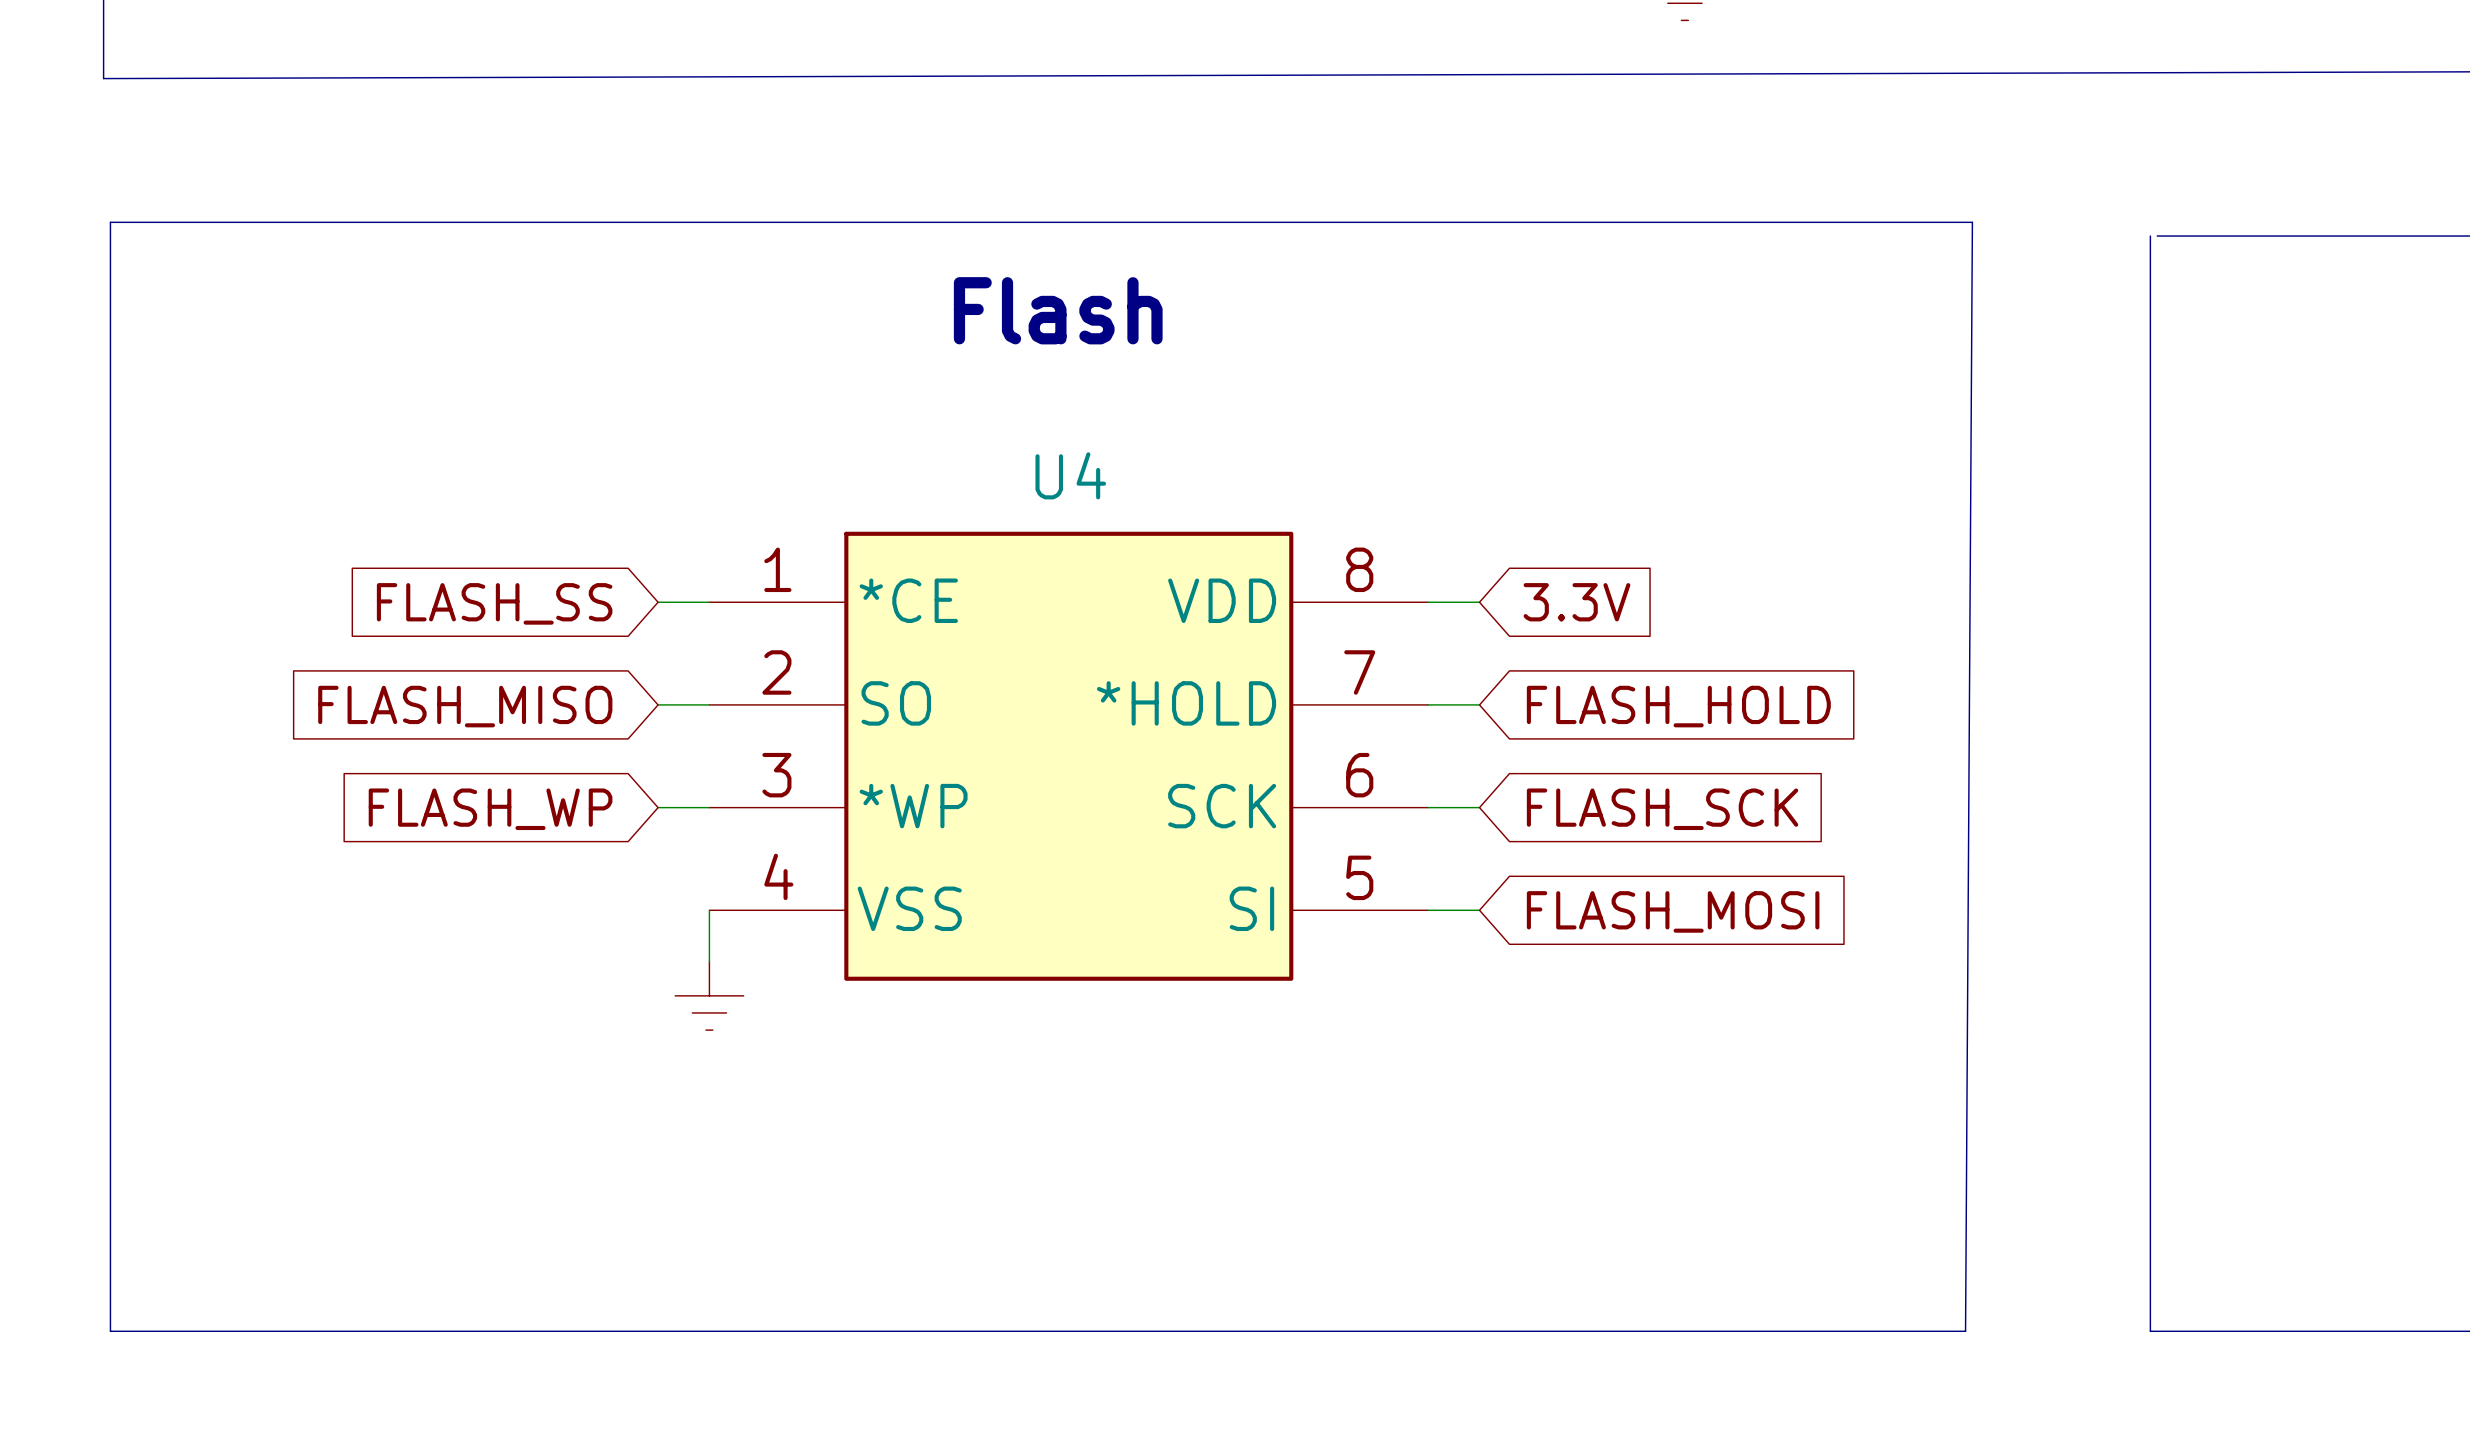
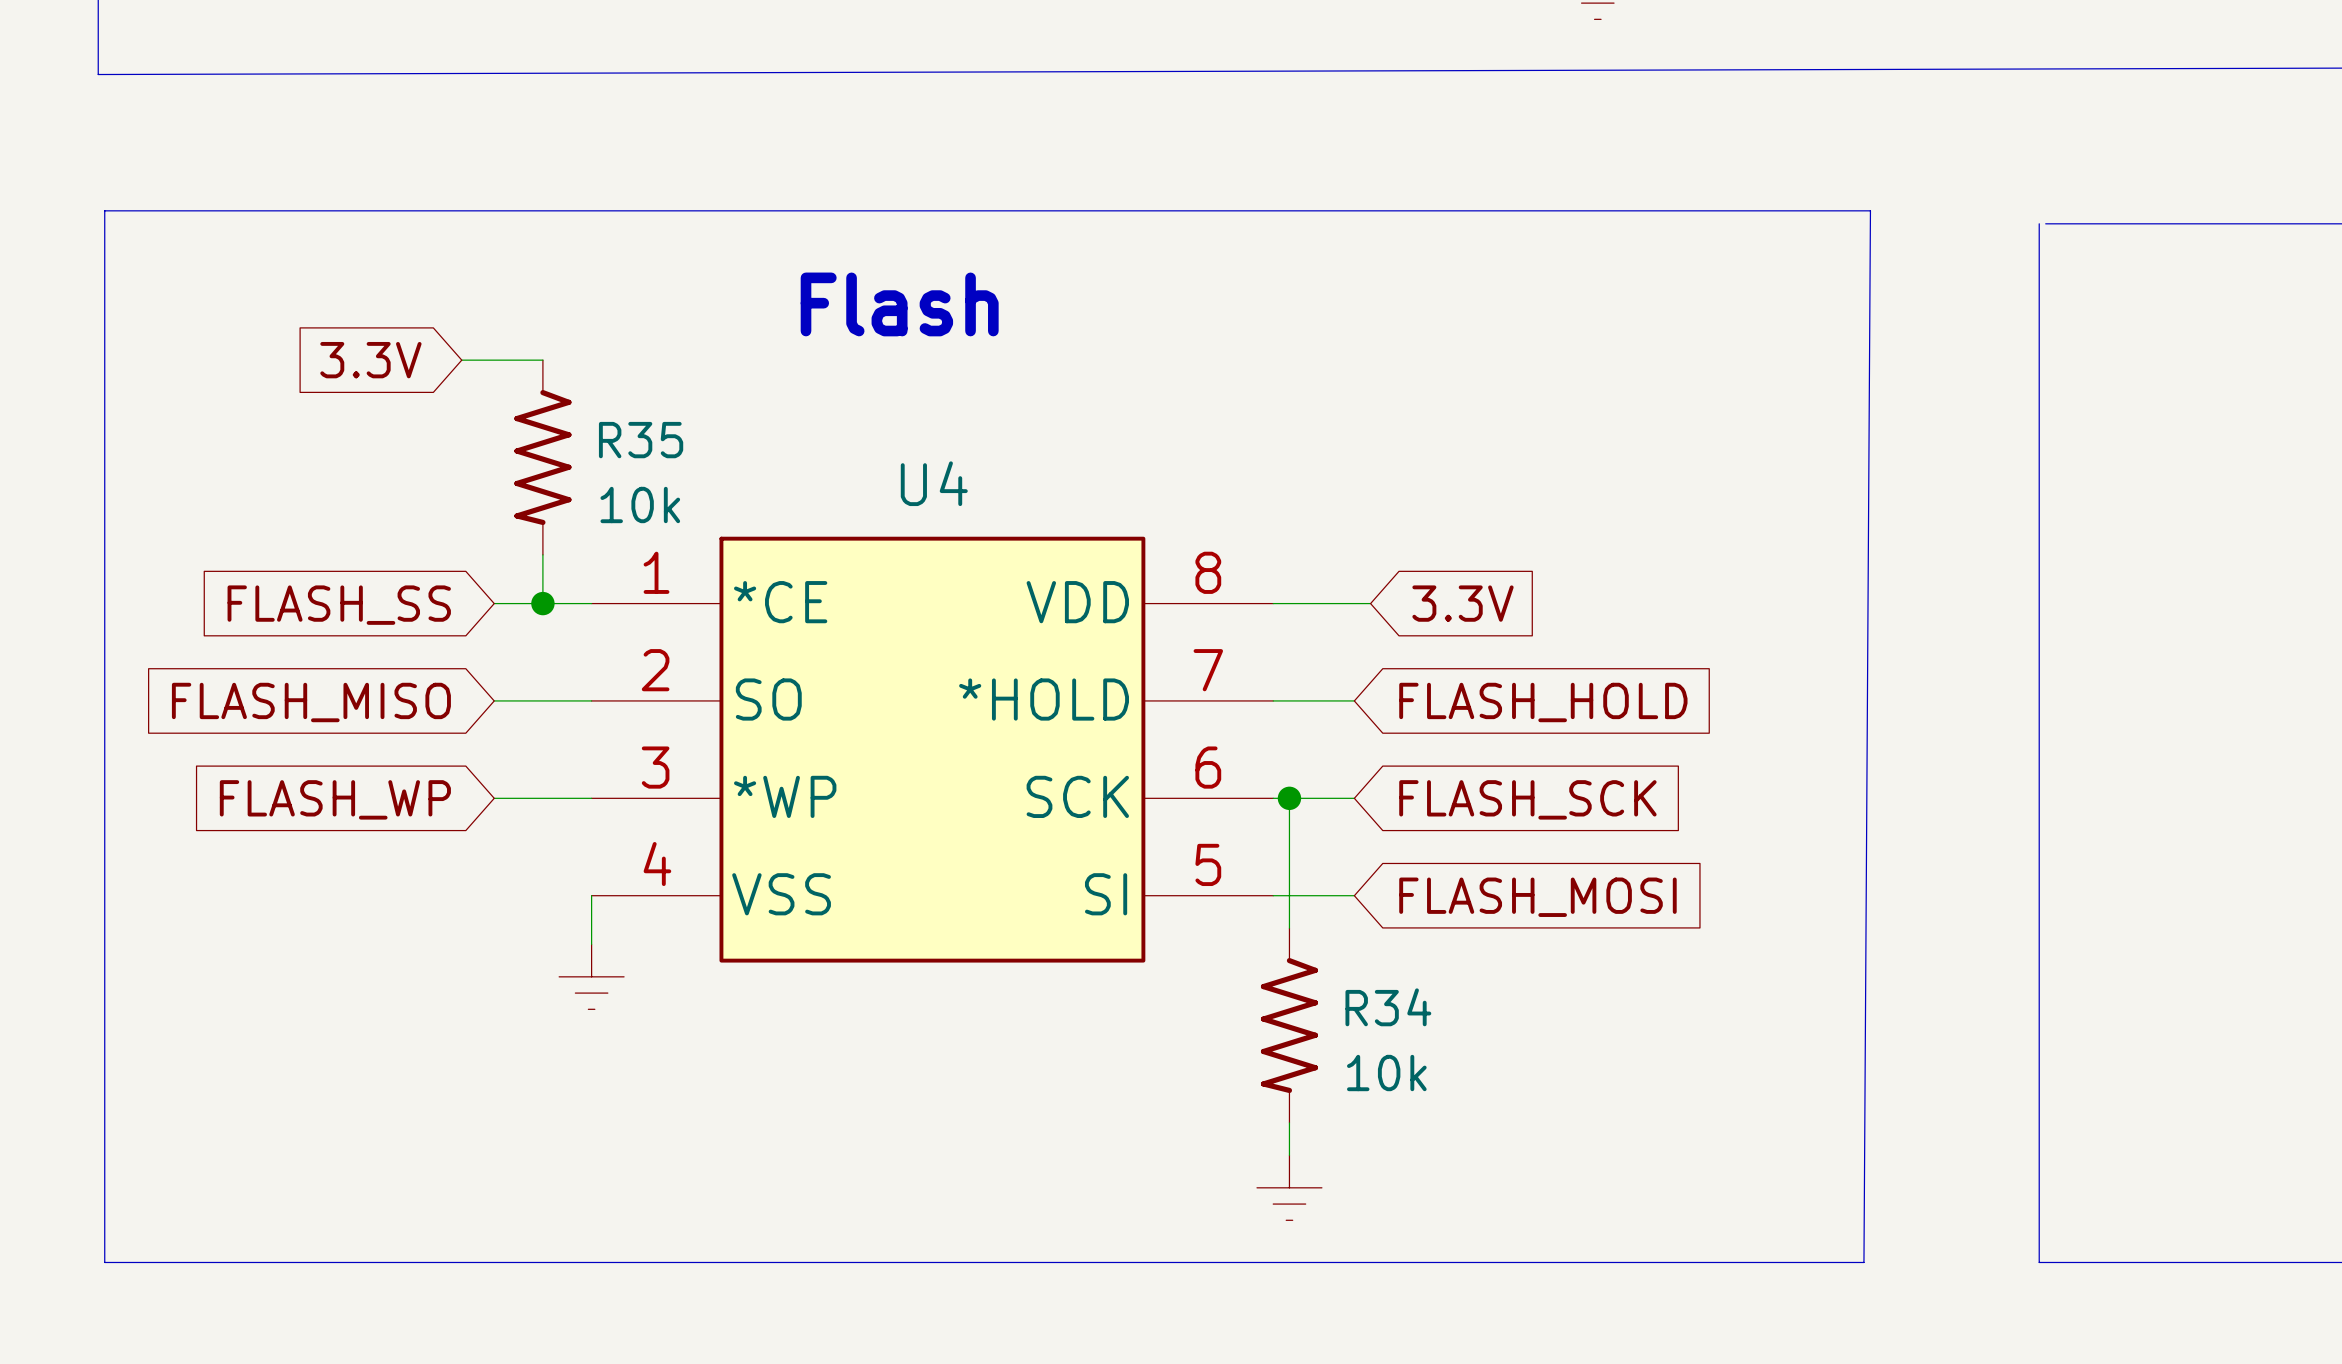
text position: Flash (1058, 310) -> Flash (899, 304)
global label: none -> 3.3V (370, 360)
wire: none -> (461, 360) (542, 360)
R35: none -> 10k (542, 457)
wire: none -> (542, 554) (542, 603)
wire: (658, 602) (709, 602) -> none
wire: (1428, 602) (1479, 602) -> none
global label position: 3.3V (1576, 602) -> 3.3V (1463, 603)
global label position: FLASH_SS (494, 603) -> FLASH_SS (339, 605)
junction: none -> (542, 603)
wire: none -> (1273, 603) (1370, 603)
wire: (658, 704) (709, 704) -> none
wire: (1428, 704) (1479, 704) -> none
global label position: FLASH_MISO (465, 706) -> FLASH_MISO (311, 702)
global label position: FLASH_HOLD (1678, 706) -> FLASH_HOLD (1543, 702)
wire: none -> (1273, 700) (1354, 700)
U4 position: (1068, 756) -> (932, 749)
wire: (658, 807) (709, 807) -> none
wire: (1428, 807) (1479, 807) -> none
global label position: FLASH_WP (490, 809) -> FLASH_WP (335, 799)
global label position: FLASH_SCK (1662, 809) -> FLASH_SCK (1527, 799)
wire: none -> (1273, 798) (1354, 798)
wire: none -> (1289, 798) (1289, 928)
junction: none -> (1289, 798)
wire: (709, 910) (709, 961) -> (591, 895) (591, 944)
wire: (1428, 910) (1479, 910) -> none
global label position: FLASH_MOSI (1673, 911) -> FLASH_MOSI (1537, 897)
wire: none -> (1273, 895) (1354, 895)
power symbol position: (709, 995) -> (591, 976)
R34: none -> 10k (1289, 1025)
wire: none -> (1289, 1122) (1289, 1155)
power symbol: none -> (1289, 1187)

